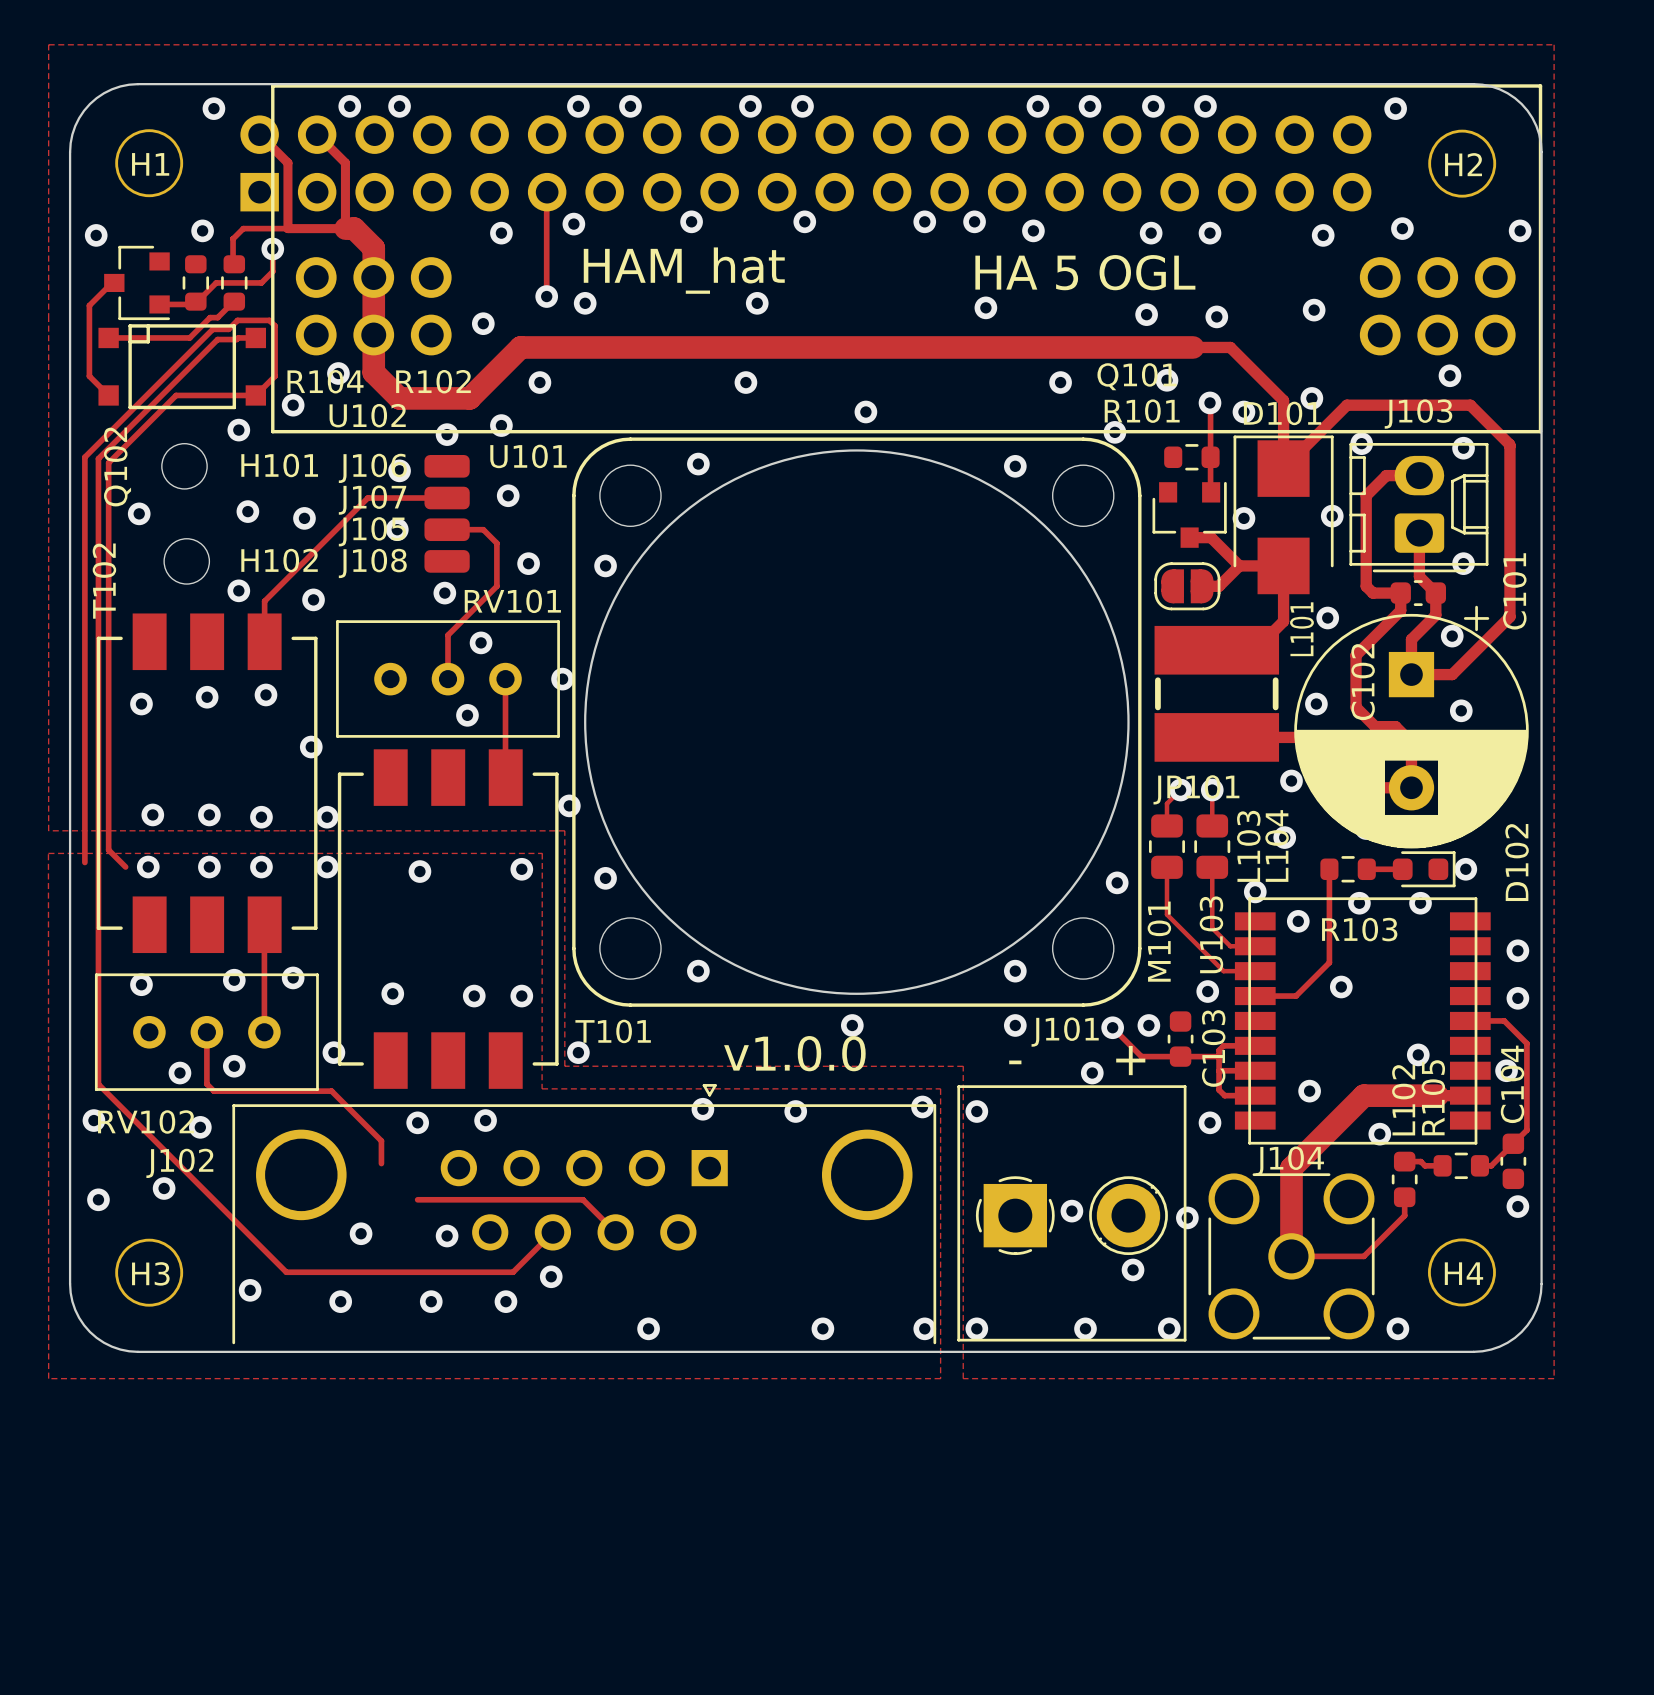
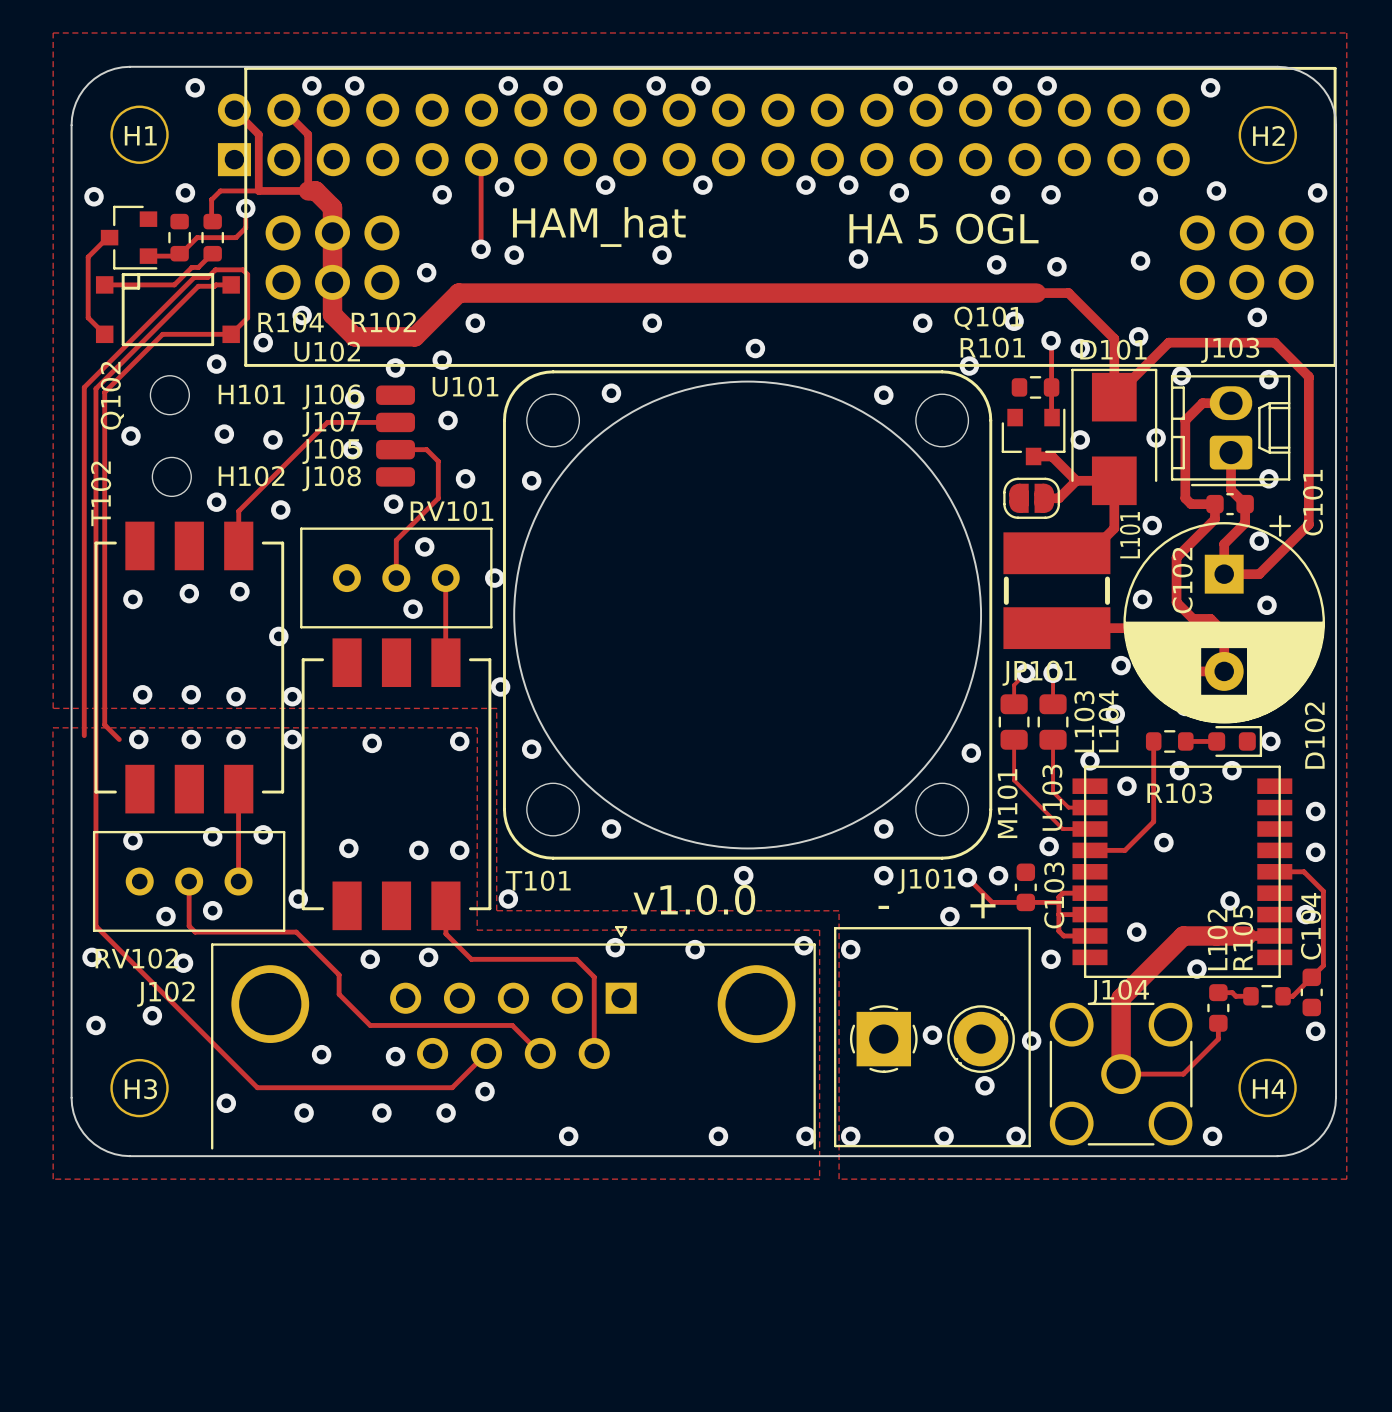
track: none -> (445, 905) (445, 933) (471, 959) (576, 959) (594, 977) (594, 1053)
track: none -> (339, 994) (370, 1025)

